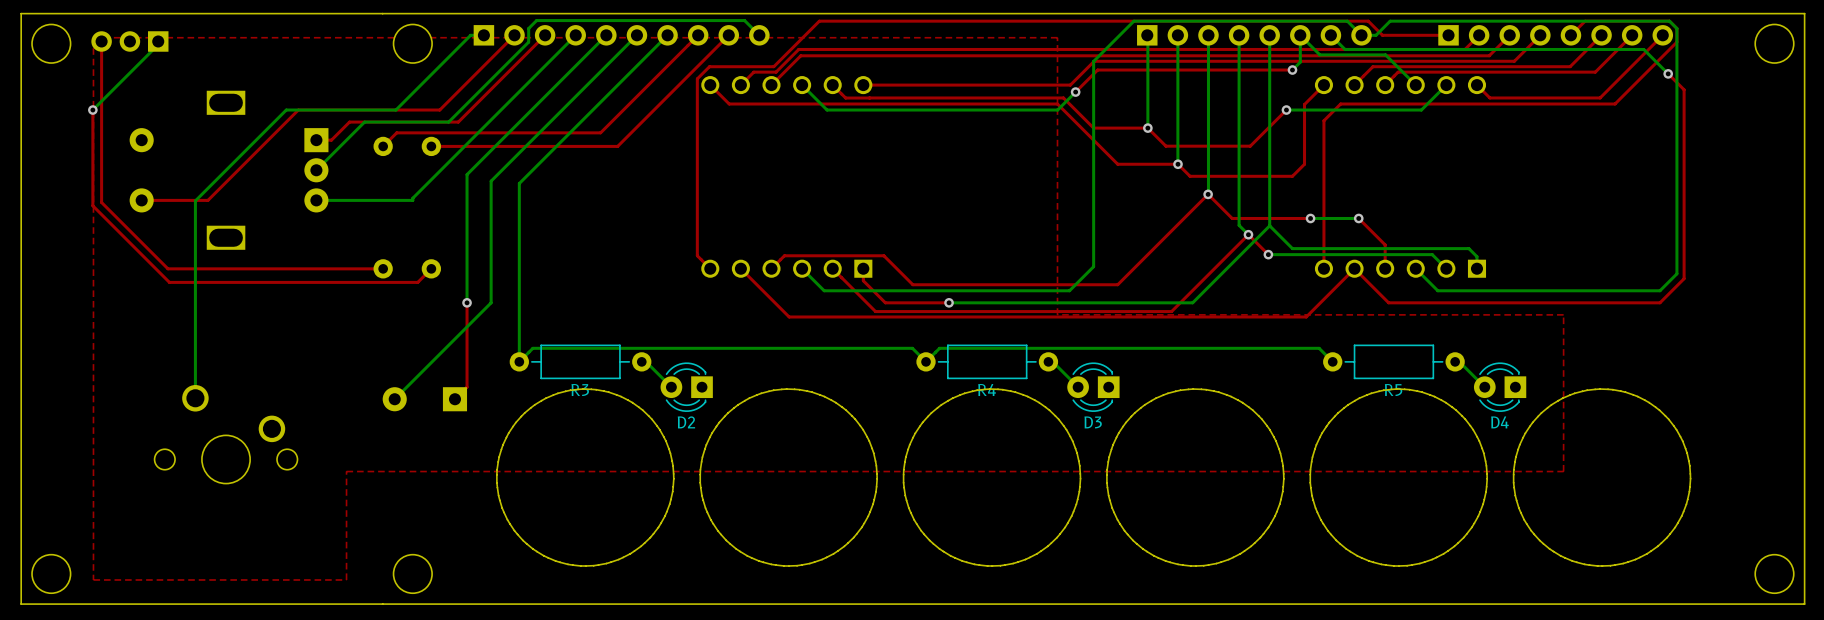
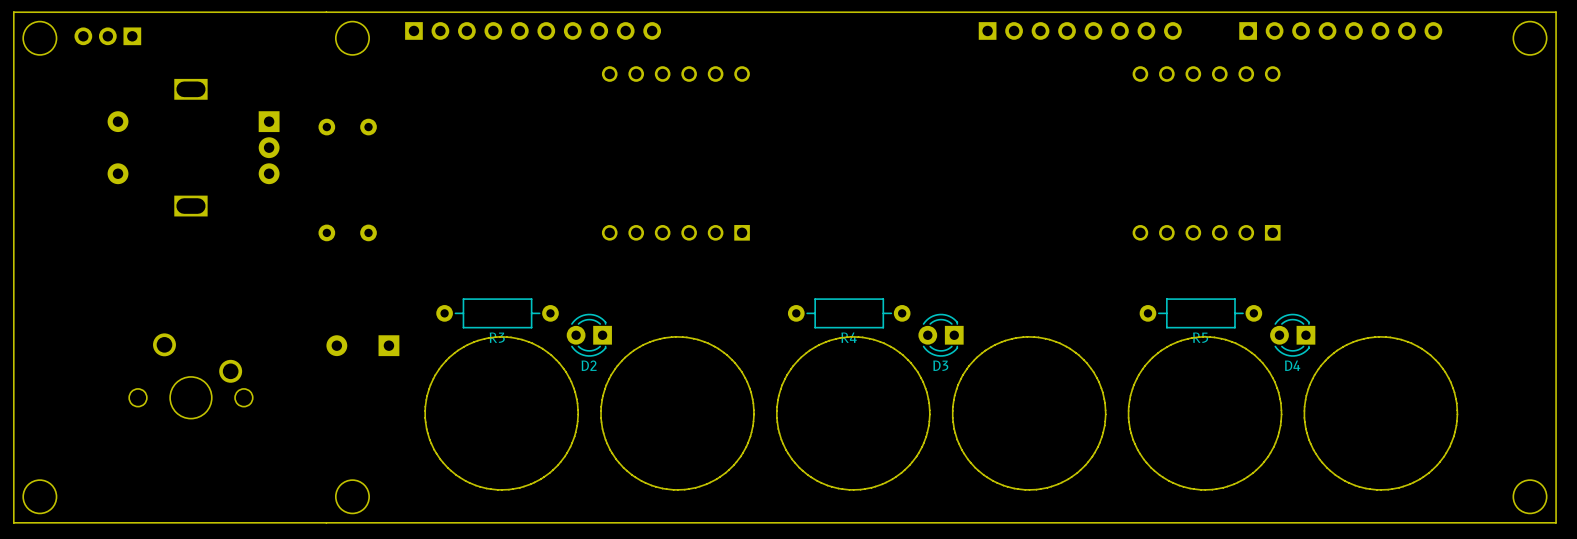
bottom track: (483, 35) (470, 35) (395, 110) (286, 110) (195, 200) (195, 398) -> none
top track: (514, 35) (439, 110) (298, 110) (207, 200) (141, 200) -> none
top track: (545, 35) (458, 122) (349, 122) (331, 140) (316, 140) -> none
bottom track: (575, 35) (412, 198) (412, 200) (316, 200) -> none
bottom track: (606, 35) (467, 174) (467, 302) -> none
bottom track: (636, 35) (491, 181) (491, 302) (394, 399) -> none
bottom track: (667, 35) (519, 183) (519, 361) (532, 348) (912, 348) (926, 361) (939, 348) (1319, 348) (1332, 361) -> none
top track: (698, 35) (600, 132) (396, 132) (383, 146) -> none
top track: (728, 35) (617, 146) (431, 146) -> none
bottom track: (759, 35) (744, 20) (536, 20) (528, 28) (528, 42) (448, 122) (364, 122) (316, 170) -> none
bottom track: (1147, 35) (1147, 128) -> none
bottom track: (1177, 35) (1177, 164) -> none
bottom track: (1208, 35) (1208, 194) -> none
bottom track: (1239, 35) (1239, 225) (1248, 234) -> none
bottom track: (1269, 35) (1269, 225) -> none
bottom track: (1330, 35) (1345, 49) (1643, 49) (1668, 73) -> none
top track: (1448, 35) (1382, 35) (1368, 21) (819, 21) (773, 66) (709, 66) (697, 78) (697, 255) (710, 268) -> none
top track: (1479, 35) (1464, 49) (798, 49) (776, 72) (753, 72) (740, 85) -> none
top track: (1509, 35) (1489, 55) (800, 55) (771, 85) -> none
top track: (1540, 35) (1514, 61) (1094, 61) (1070, 85) (863, 85) -> none
top track: (1570, 35) (1585, 21) (1669, 21) (1676, 28) (1676, 42) (1615, 104) (1340, 104) (1323, 120) (1323, 268) -> none
top track: (1601, 35) (1570, 66) (1372, 66) (1354, 85) -> none
top track: (1632, 35) (1595, 72) (1398, 72) (1385, 85) -> none
top track: (1662, 35) (1600, 97) (1489, 97) (1476, 85) -> none
top zone outline: (1057, 37) (1057, 314) (1563, 314) (1563, 471) (346, 471) (346, 579) (93, 579) (93, 37) (1057, 37) -> none
top track: (101, 41) (101, 202) (167, 268) (383, 268) -> none
bottom track: (158, 41) (158, 44) (92, 110) -> none
top track: (1292, 70) (1097, 70) (1075, 92) -> none
bottom track: (1292, 70) (1300, 62) (1300, 35) (1319, 54) (1385, 54) (1415, 85) -> none
via: (1292, 70) -> none
top track: (1668, 73) (1684, 89) (1684, 278) (1660, 302) (1388, 302) (1354, 268) (1306, 316) (789, 316) (740, 268) -> none
via: (1668, 73) -> none
bottom track: (802, 85) (827, 110) (1057, 110) (1075, 92) -> none
top track: (832, 85) (845, 98) (869, 98) -> none
top track: (1323, 85) (1304, 104) (1304, 164) (1292, 176) (1190, 176) (1178, 164) (1117, 164) (1057, 104) (729, 104) (710, 85) -> none
bottom track: (1446, 85) (1421, 110) (1286, 110) -> none
via: (1075, 92) -> none
top track: (869, 97) (1063, 97) (1093, 128) (1147, 128) (1165, 146) (1250, 146) (1286, 110) -> none
top track: (92, 110) (92, 205) (169, 282) (417, 282) (431, 268) -> none
via: (92, 110) -> none
via: (1286, 110) -> none
via: (1147, 128) -> none
via: (1178, 164) -> none
via: (1208, 194) -> none
top track: (1310, 218) (1232, 218) (1208, 194) (1117, 284) (912, 284) (883, 255) (784, 255) (771, 268) -> none
via: (1310, 218) -> none
top track: (1358, 218) (1385, 244) (1385, 268) -> none
bottom track: (1358, 218) (1310, 218) -> none
via: (1358, 218) -> none
bottom track: (1269, 225) (1292, 248) (1468, 248) (1476, 256) (1476, 268) -> none
bottom track: (1269, 225) (1192, 302) (949, 302) -> none
via: (1248, 234) -> none
top track: (1268, 254) (1248, 234) (1171, 311) (875, 311) (832, 268) -> none
bottom track: (1268, 254) (1432, 254) (1446, 268) -> none
via: (1268, 254) -> none
top track: (863, 268) (863, 280) (885, 302) (949, 302) -> none
bottom track: (1415, 268) (1437, 290) (1660, 290) (1676, 273) (1676, 28) (1669, 21) (1390, 21) (1376, 35) (1361, 35) (1347, 21) (1133, 21) (1093, 61) (1093, 266) (1069, 290) (824, 290) (802, 268) -> none
top track: (467, 302) (467, 387) (454, 399) -> none
via: (467, 302) -> none
via: (949, 302) -> none
bottom track: (641, 361) (646, 361) (671, 387) -> none
bottom track: (1048, 361) (1052, 361) (1078, 387) -> none
bottom track: (1455, 361) (1459, 361) (1484, 387) -> none

